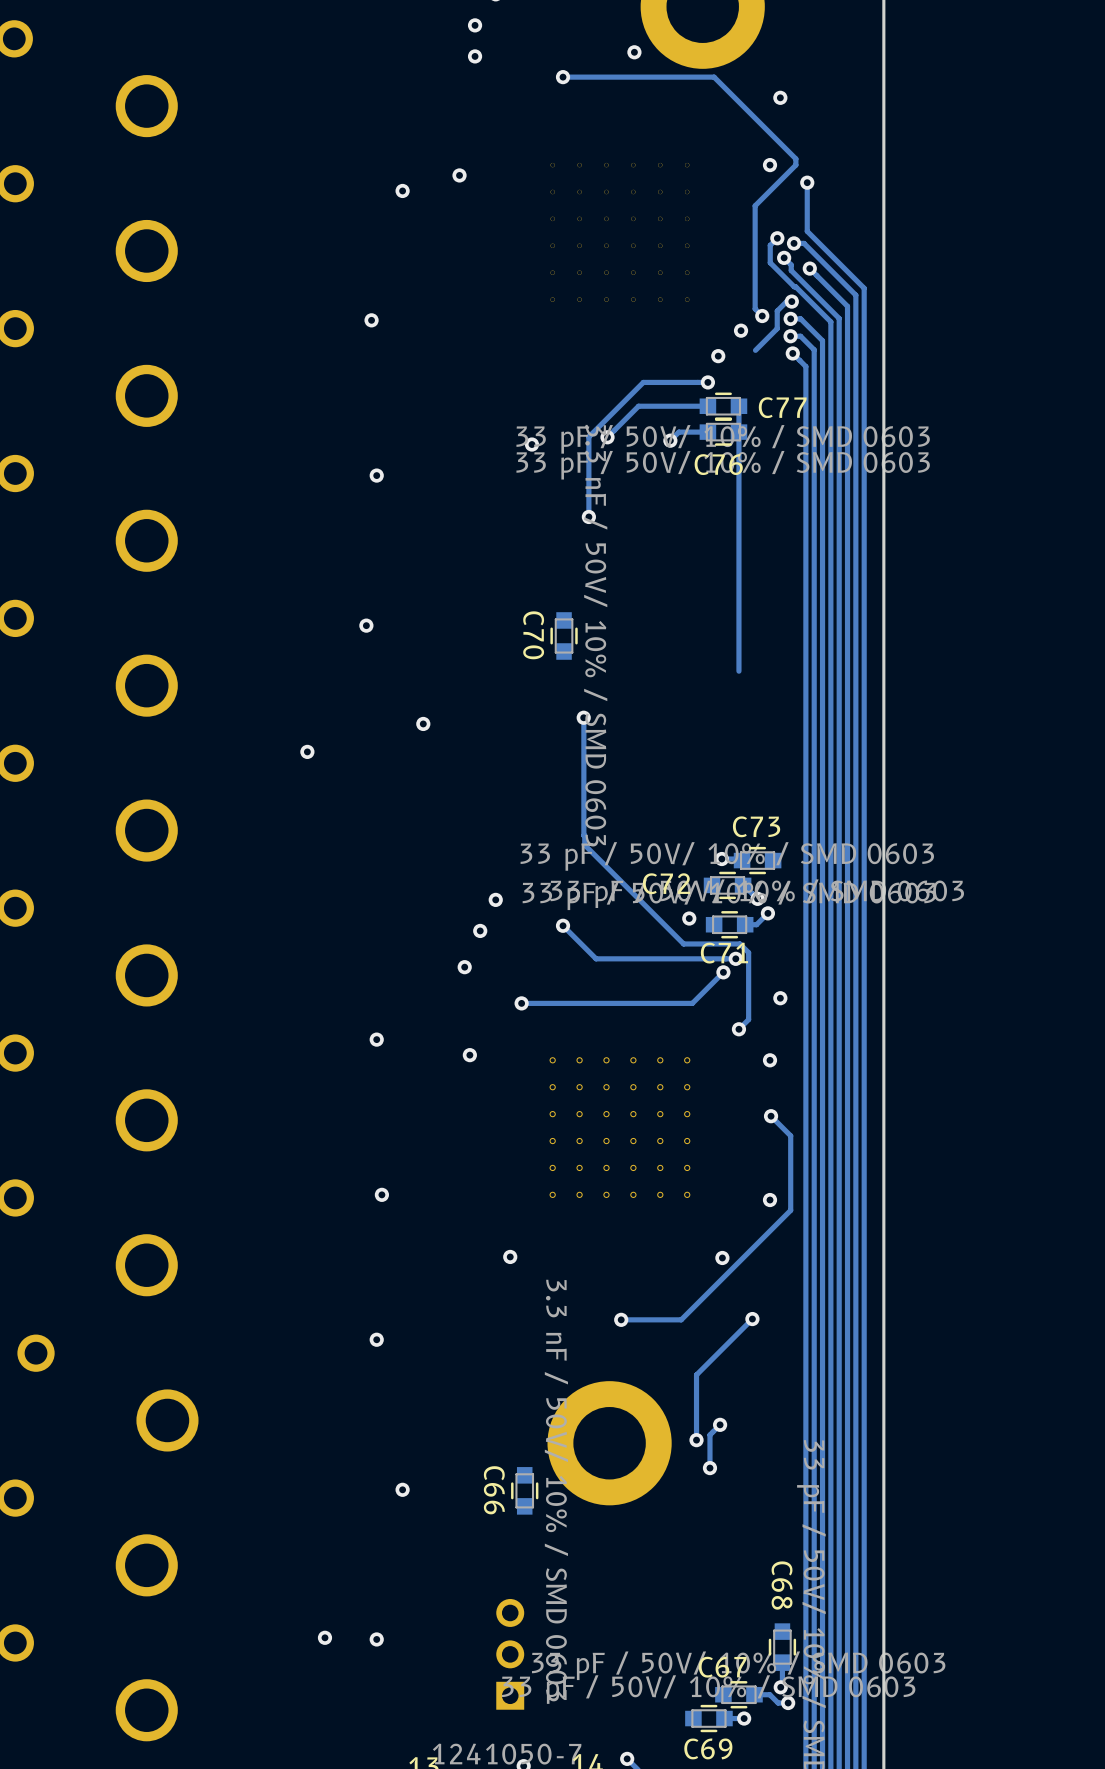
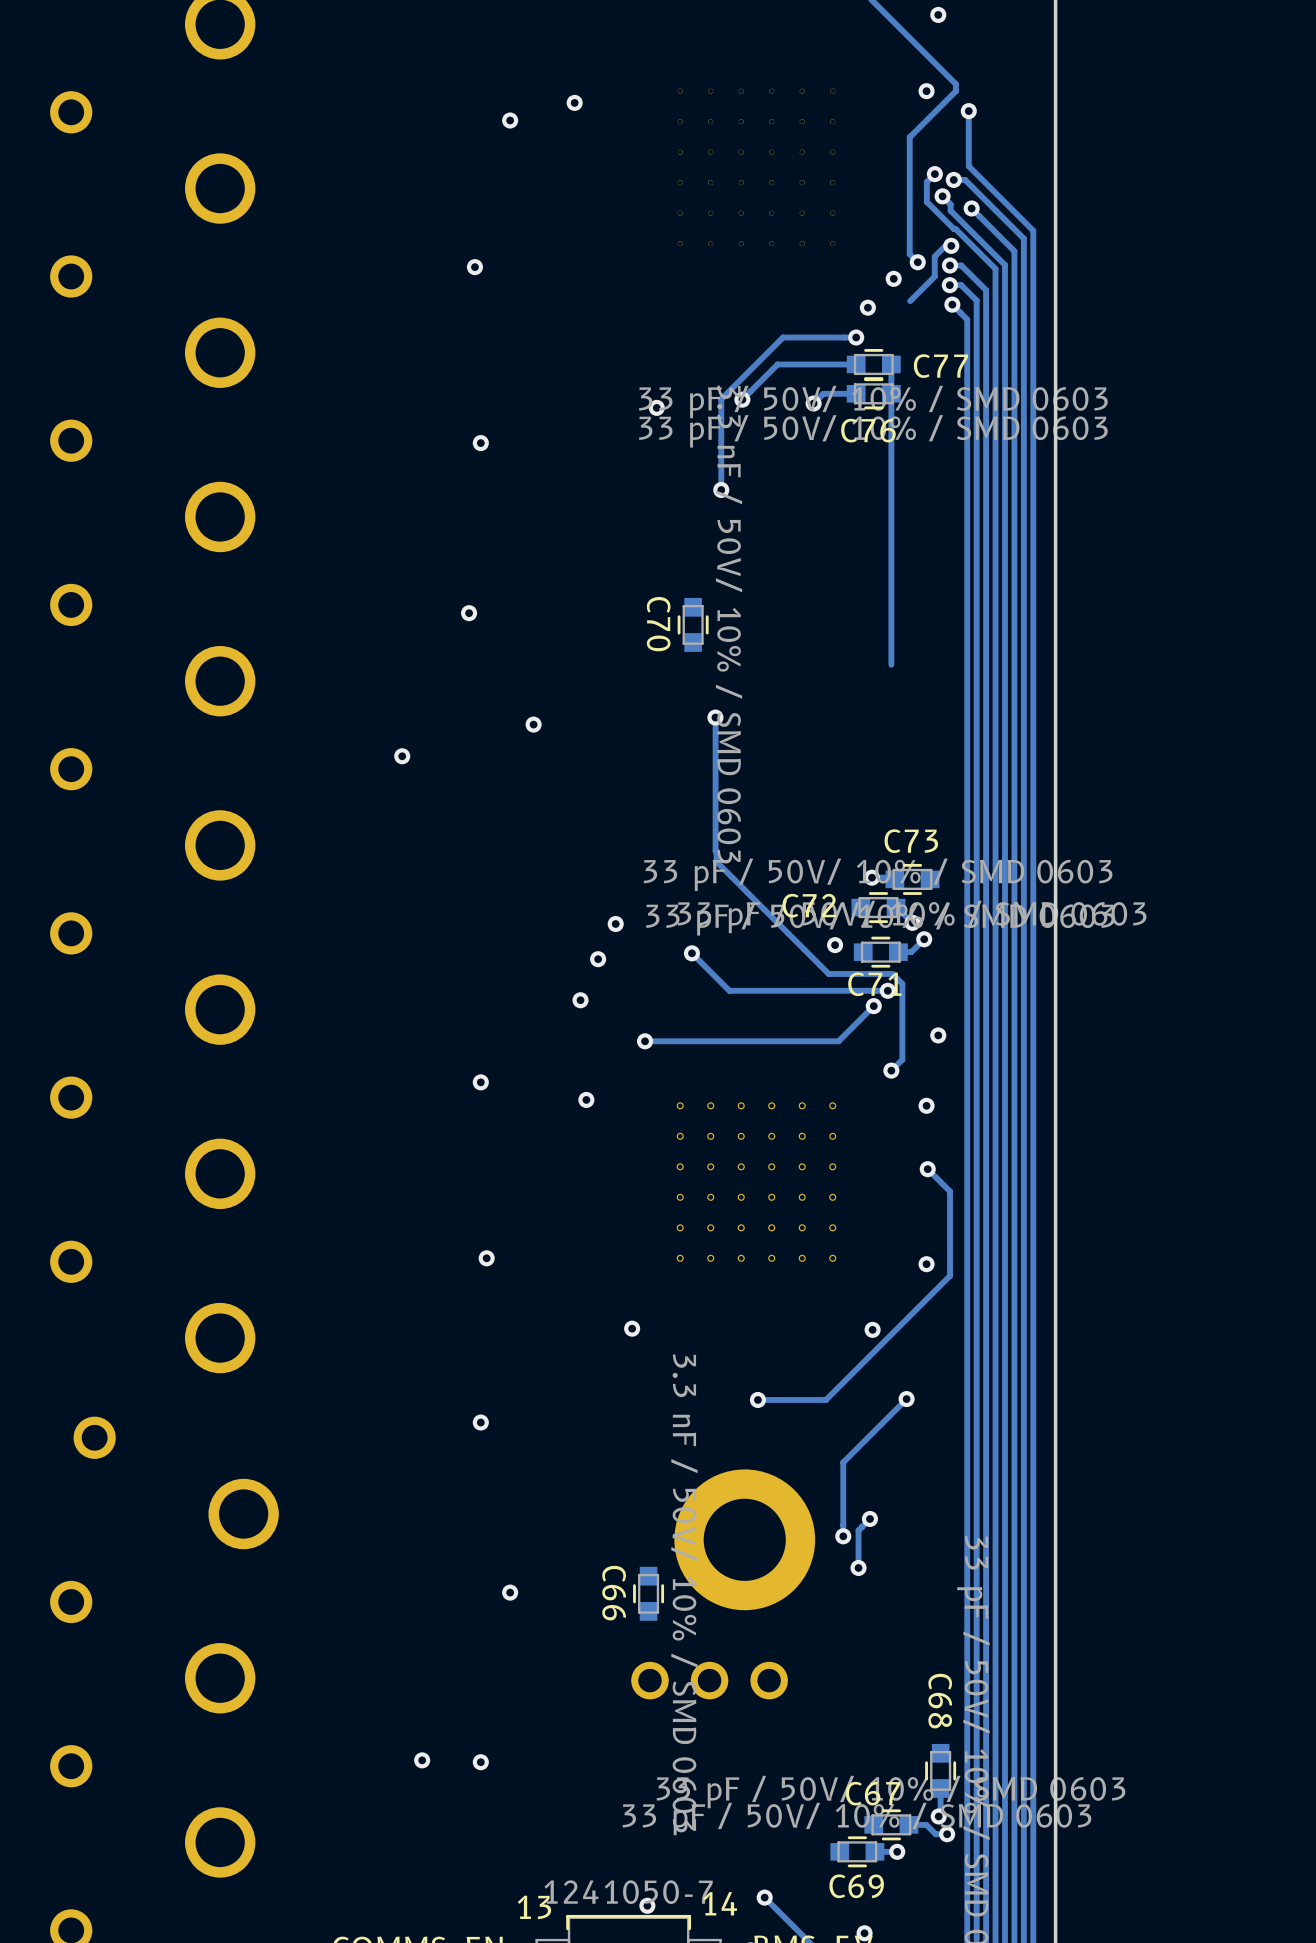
part: none -> (709, 1680)
part: (510, 1654) -> none

